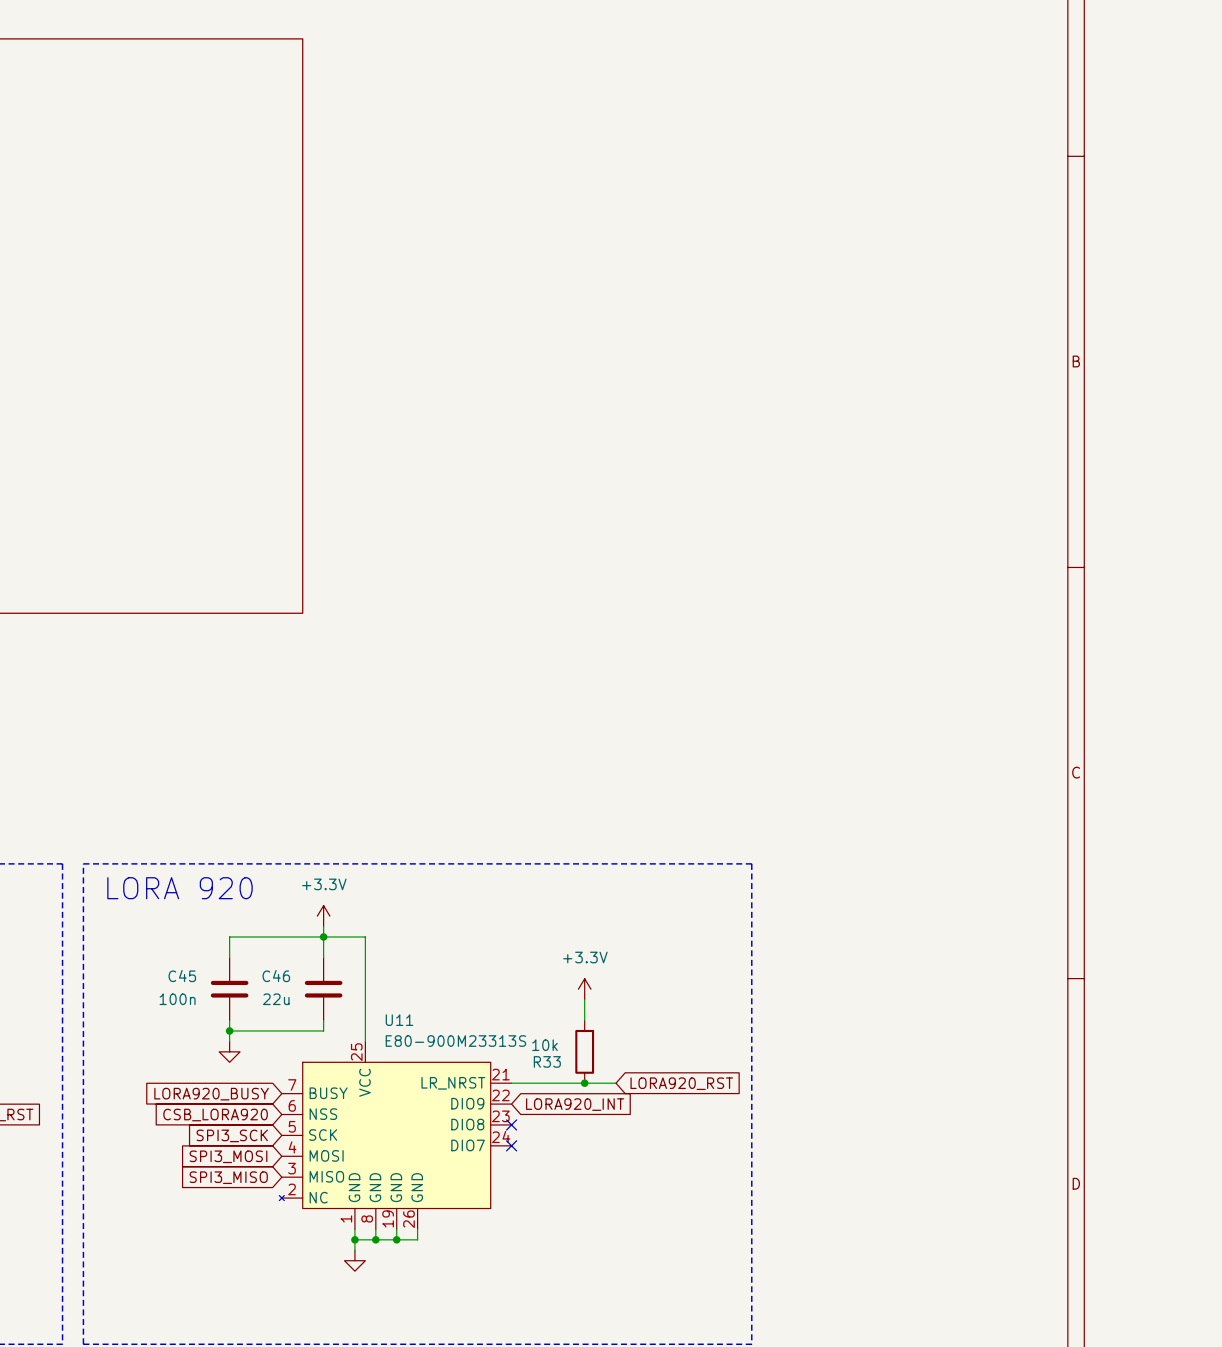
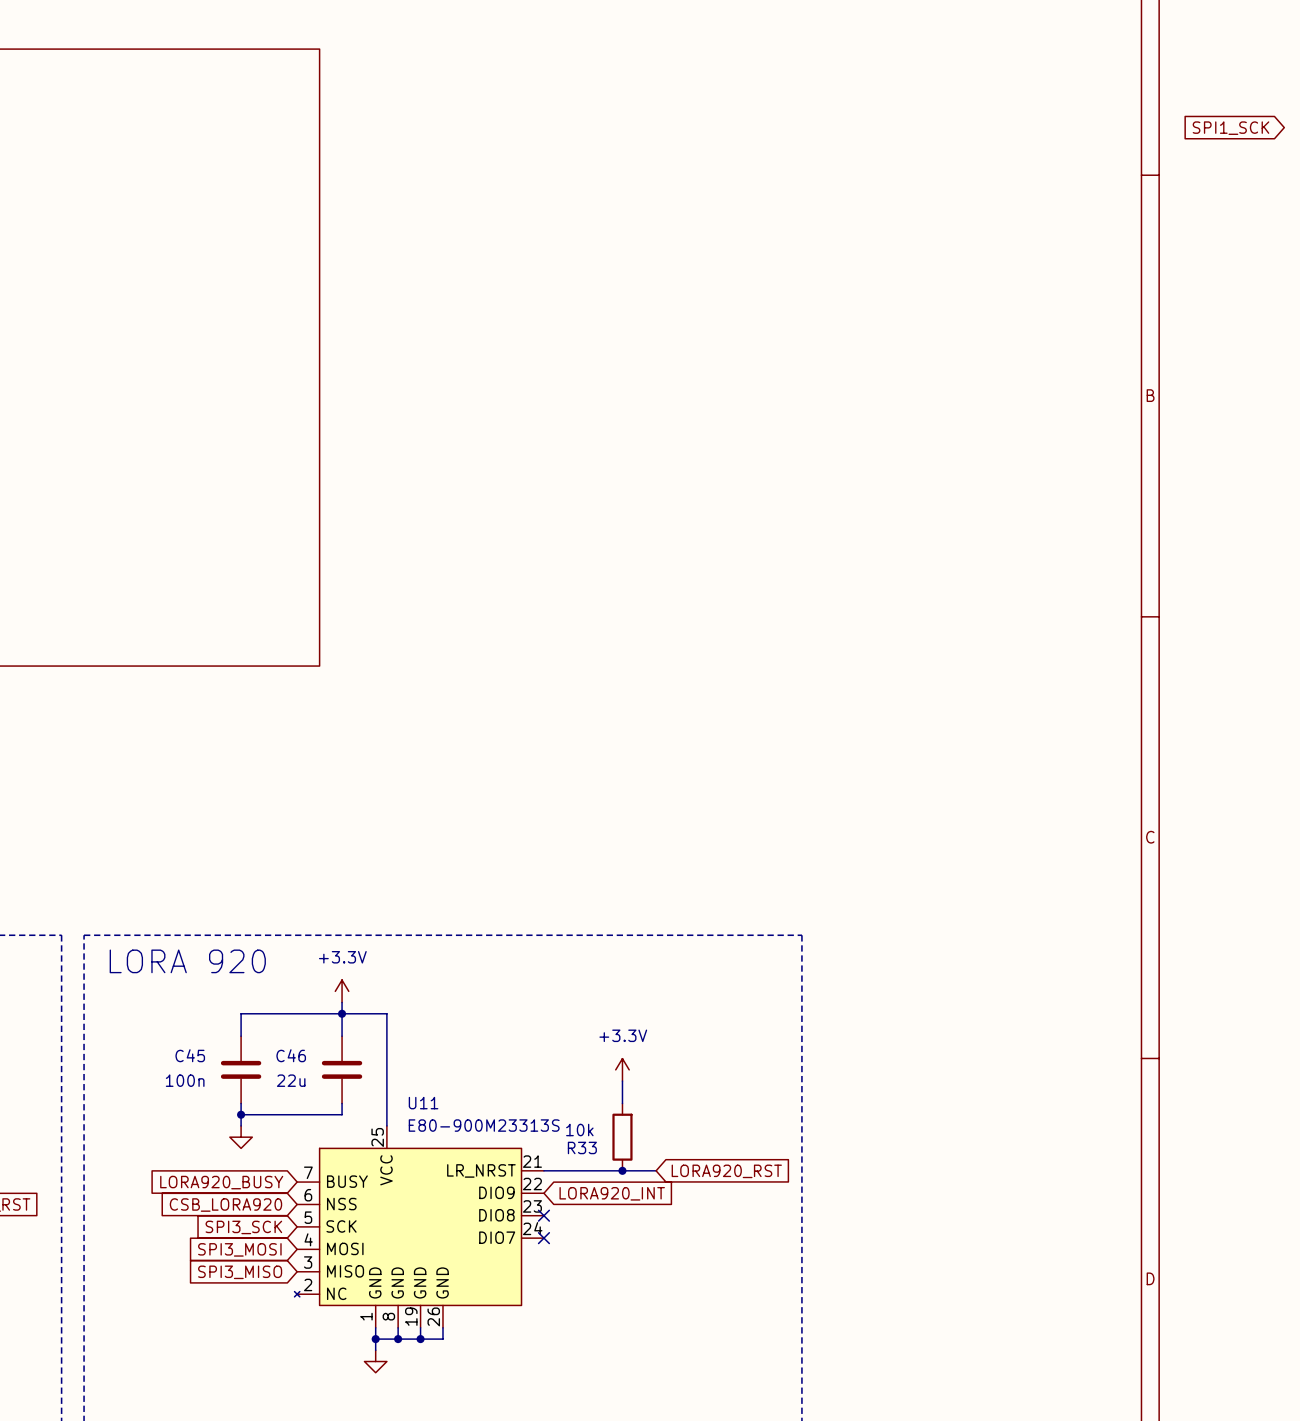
global label: none -> SPI1_SCK (1231, 128)

